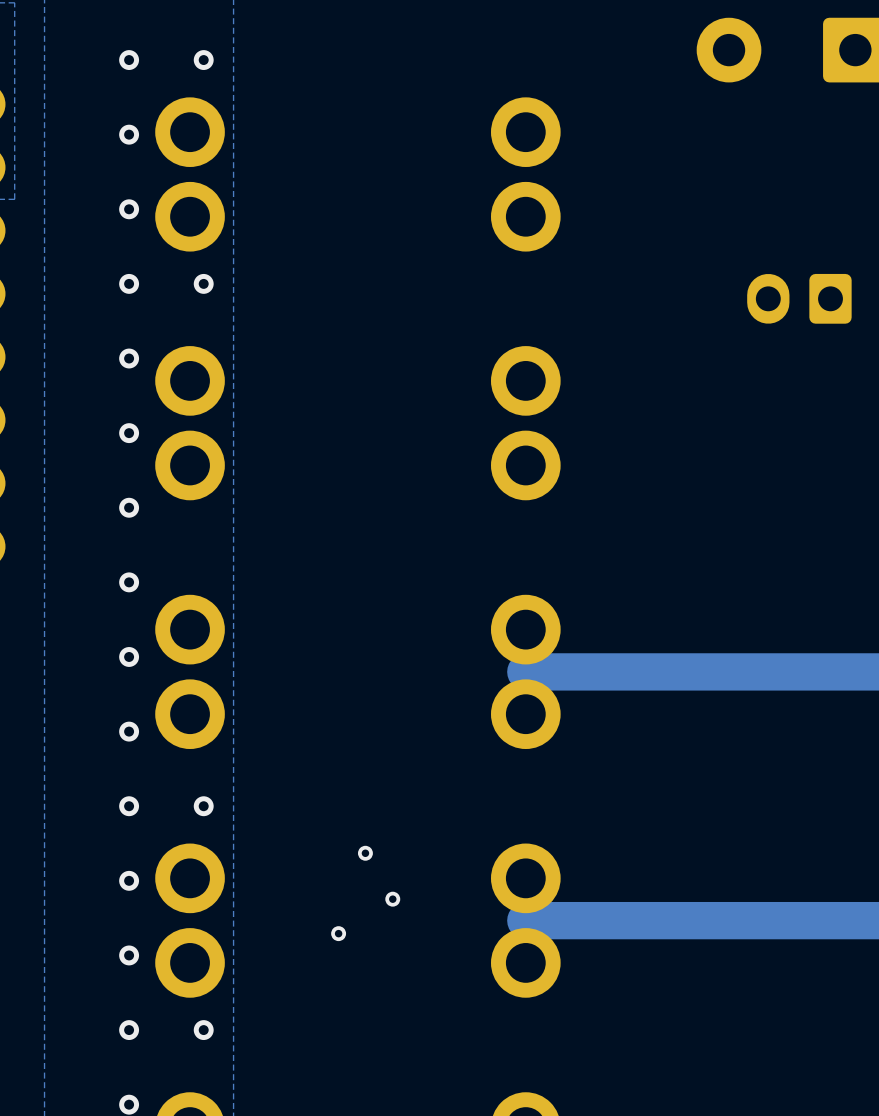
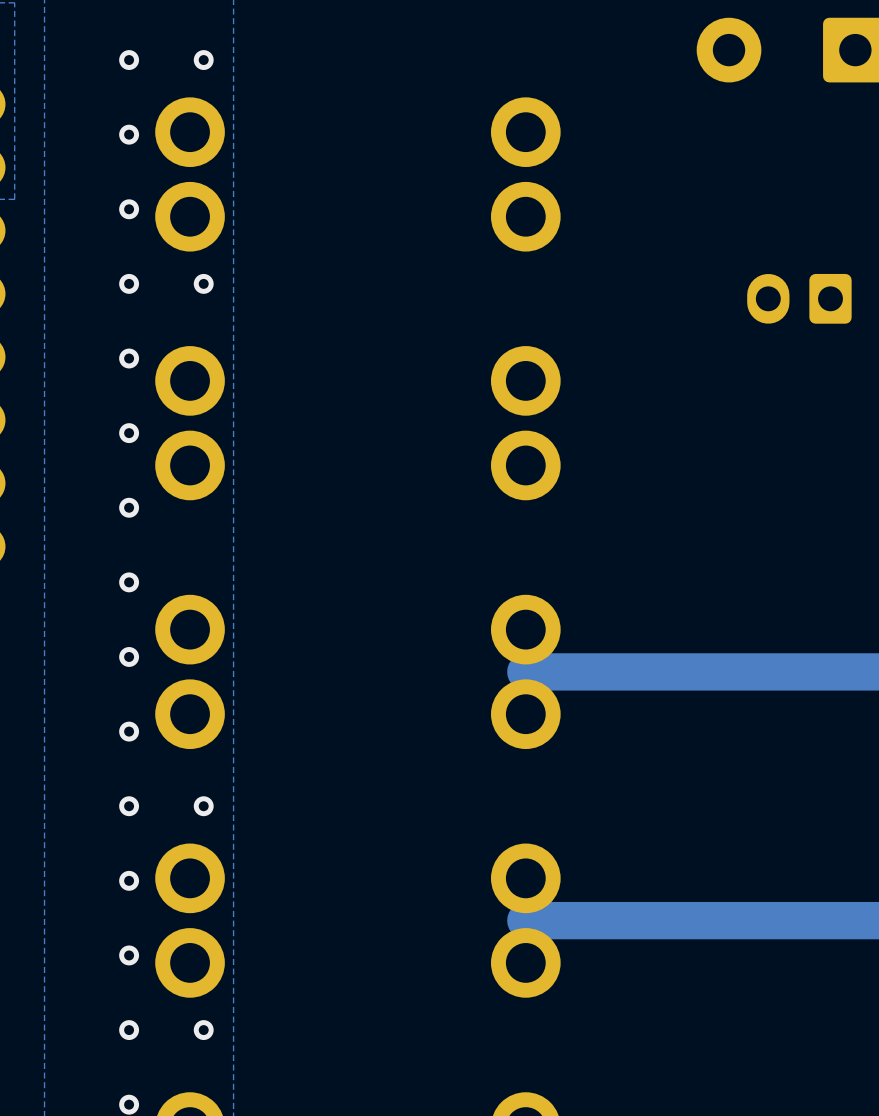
via: (365, 853) -> none
via: (392, 899) -> none
via: (338, 933) -> none

